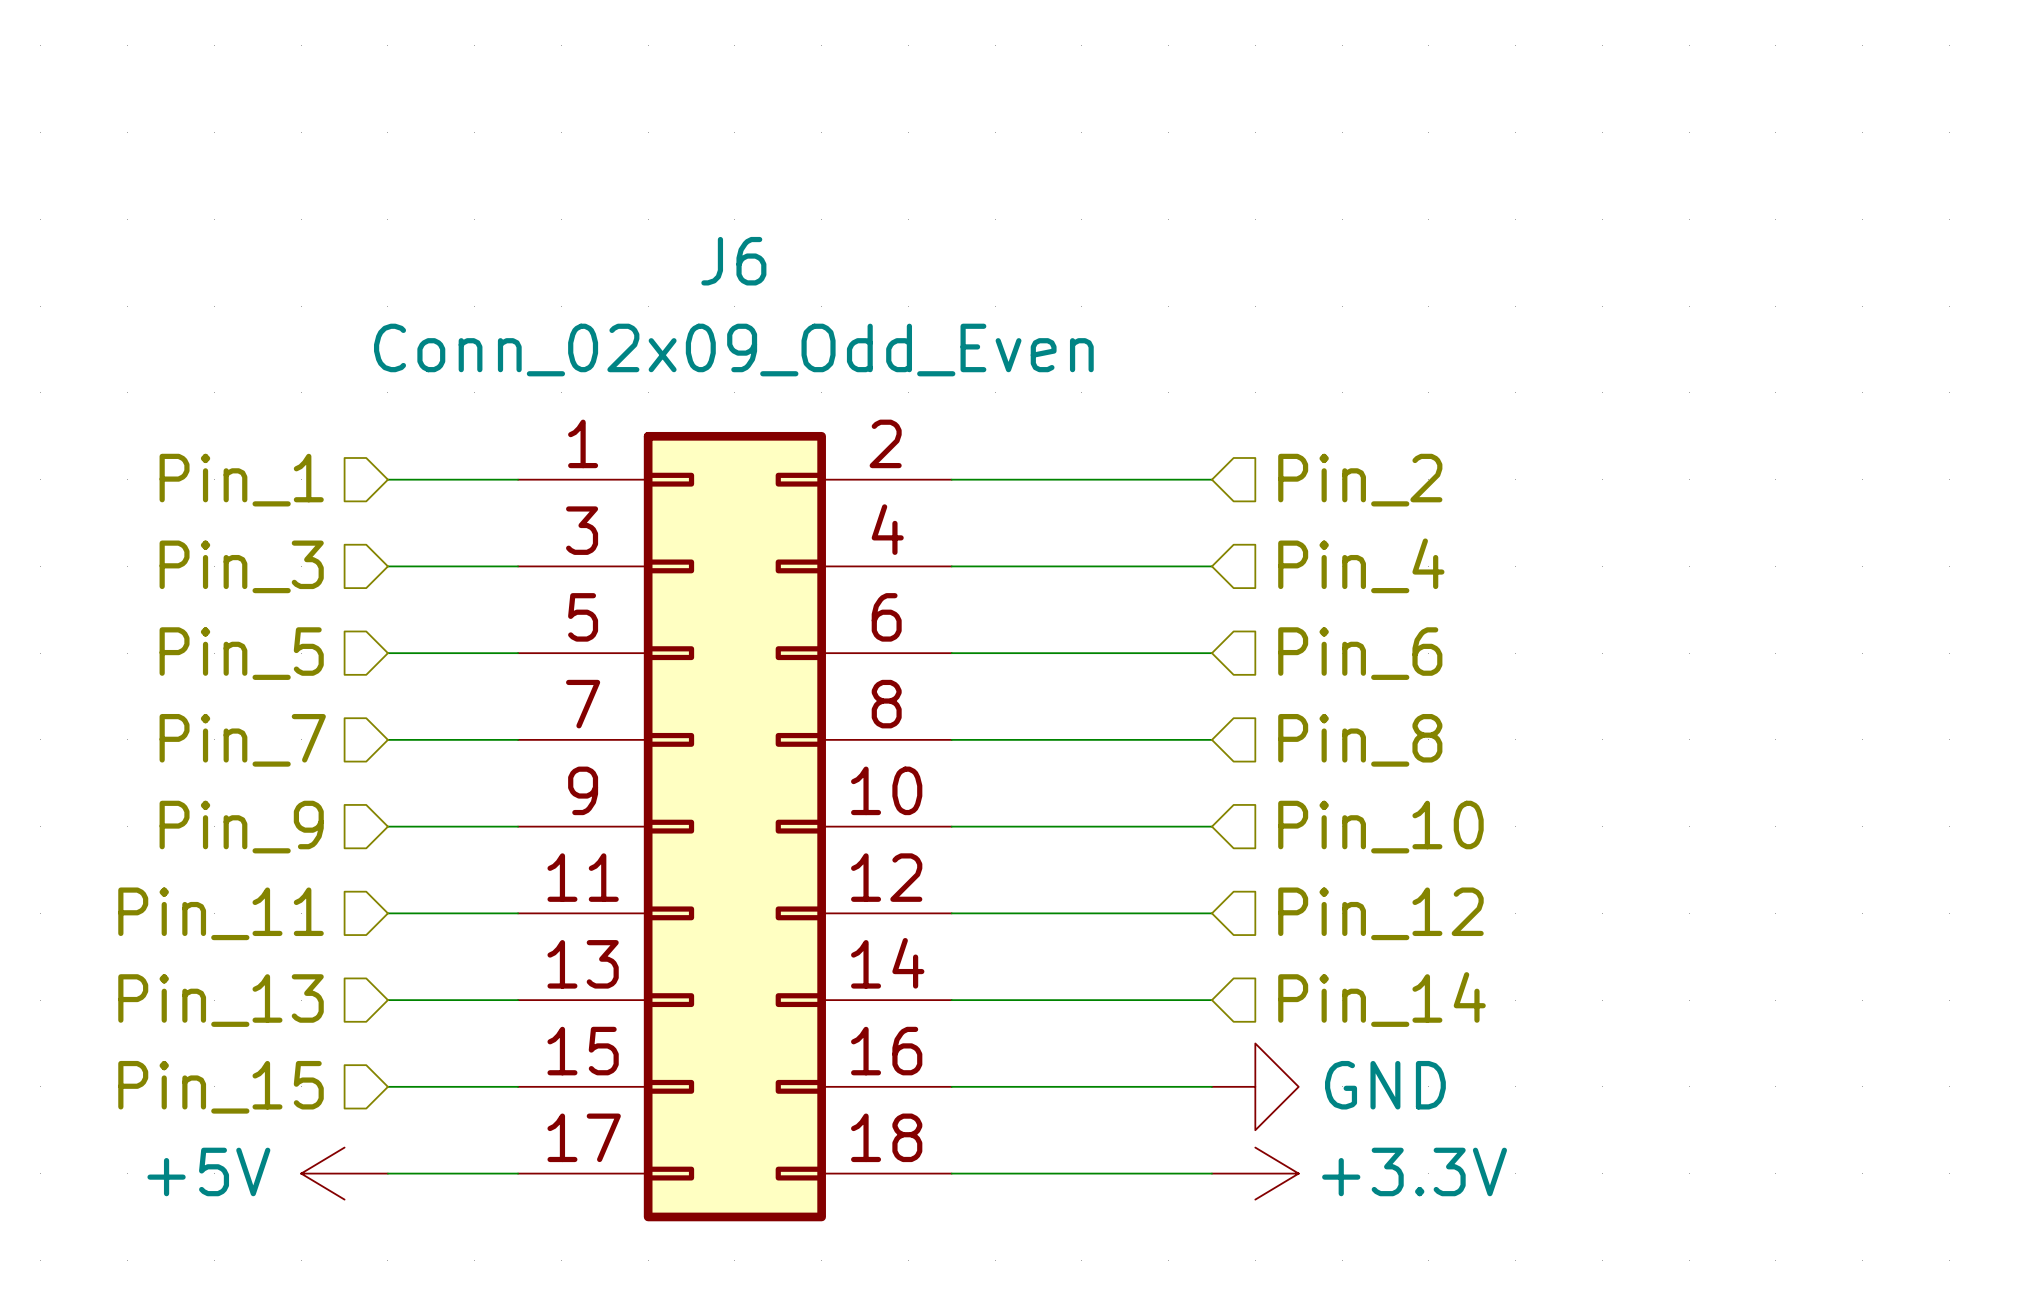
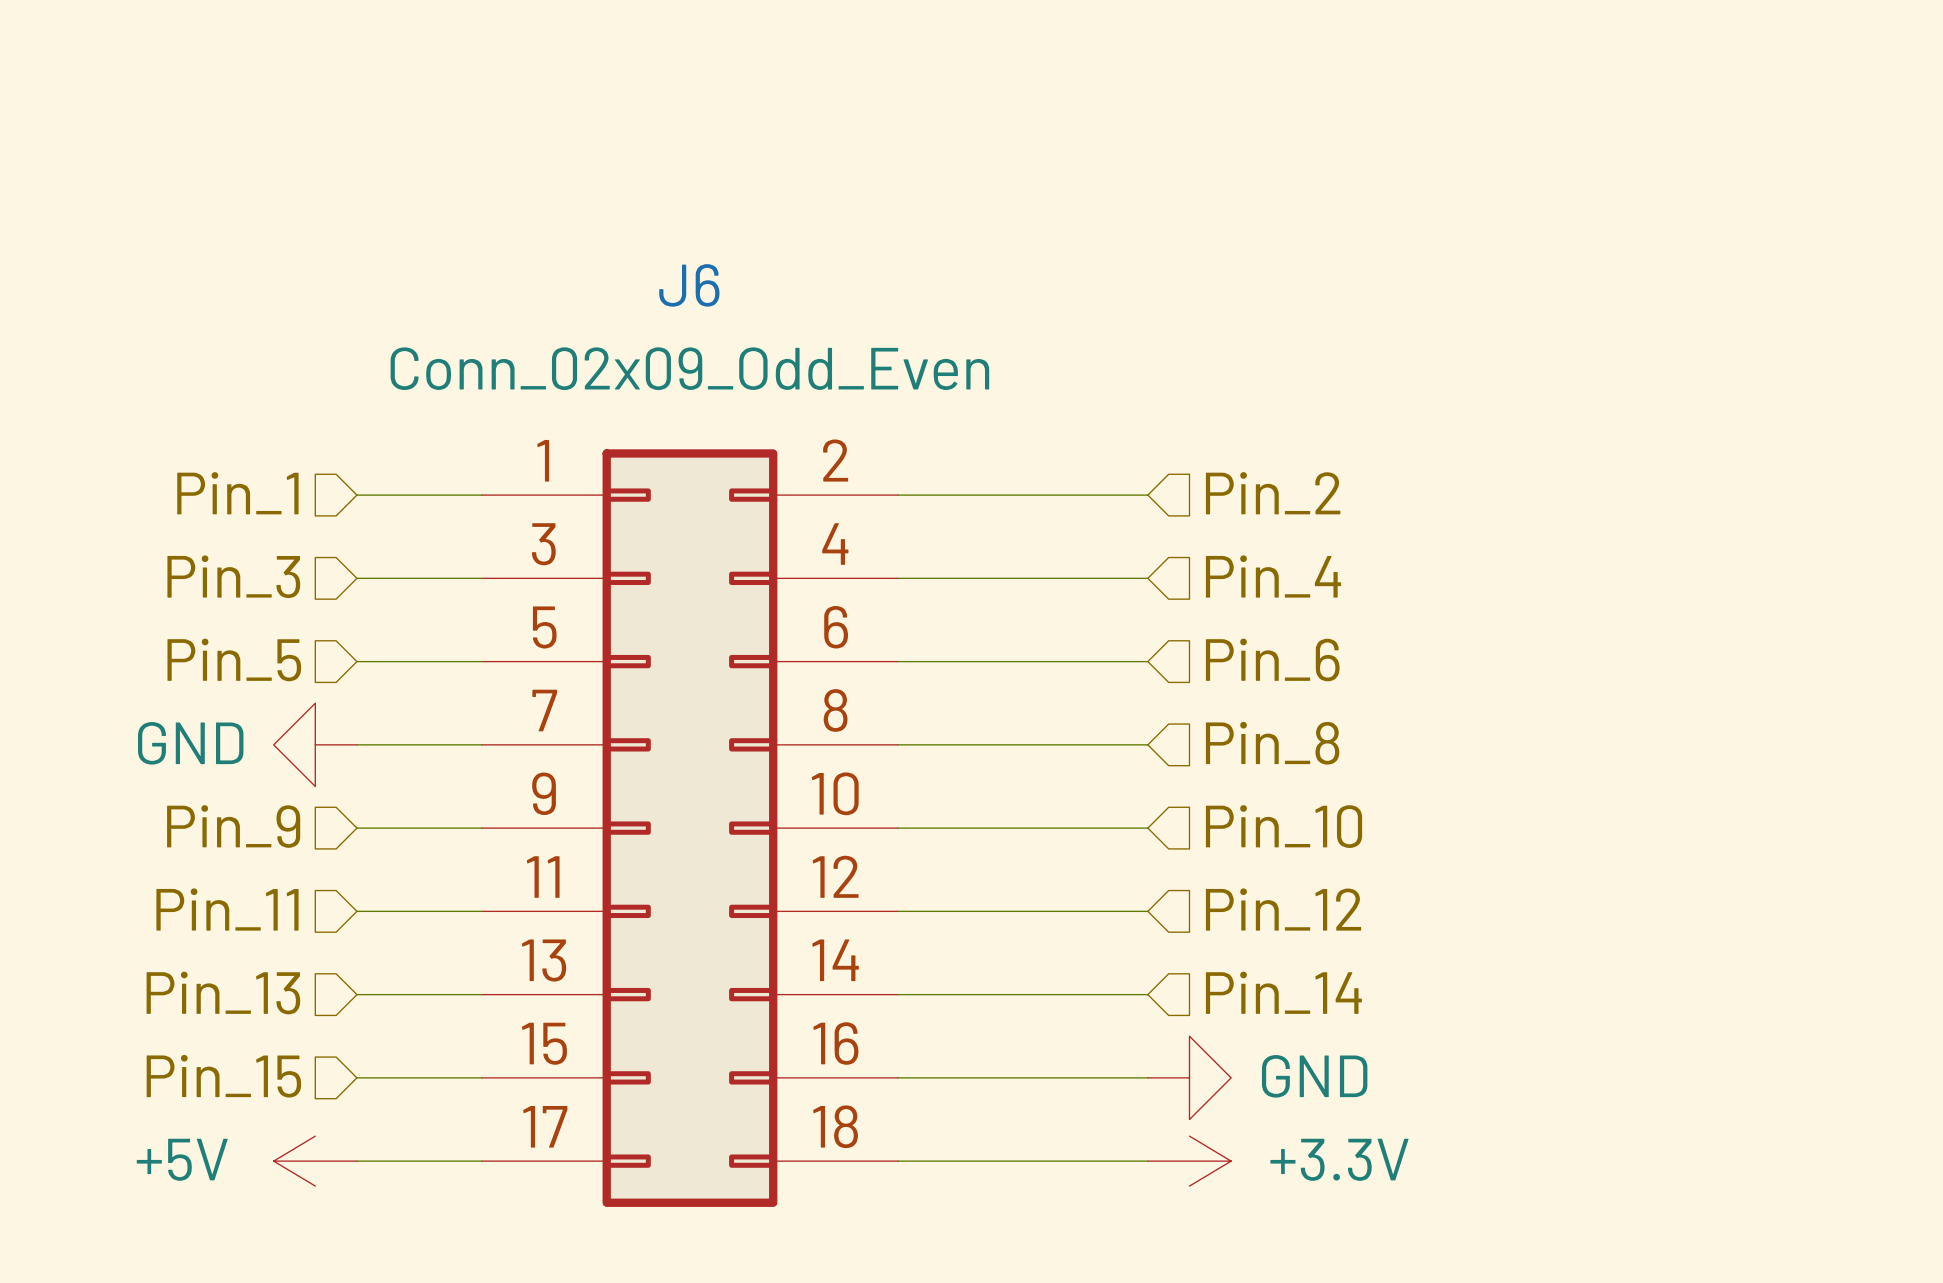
power symbol: none -> GND (315, 744)
hierarchical label: Pin_7 (242, 740) -> none

